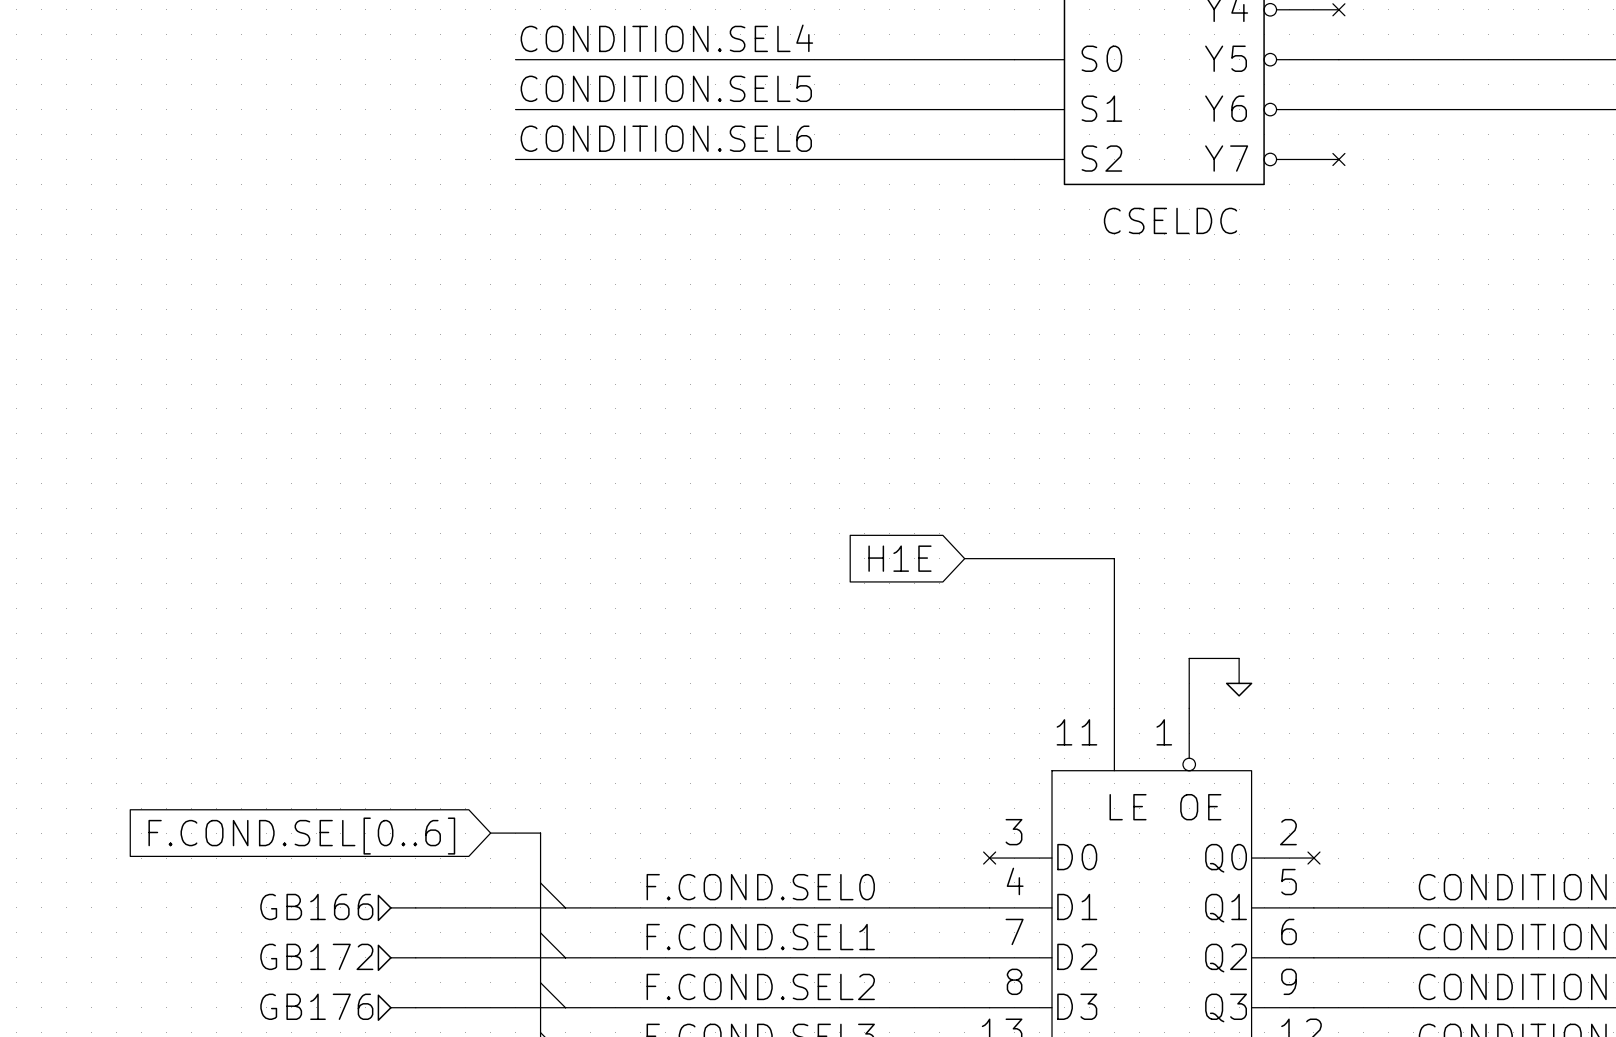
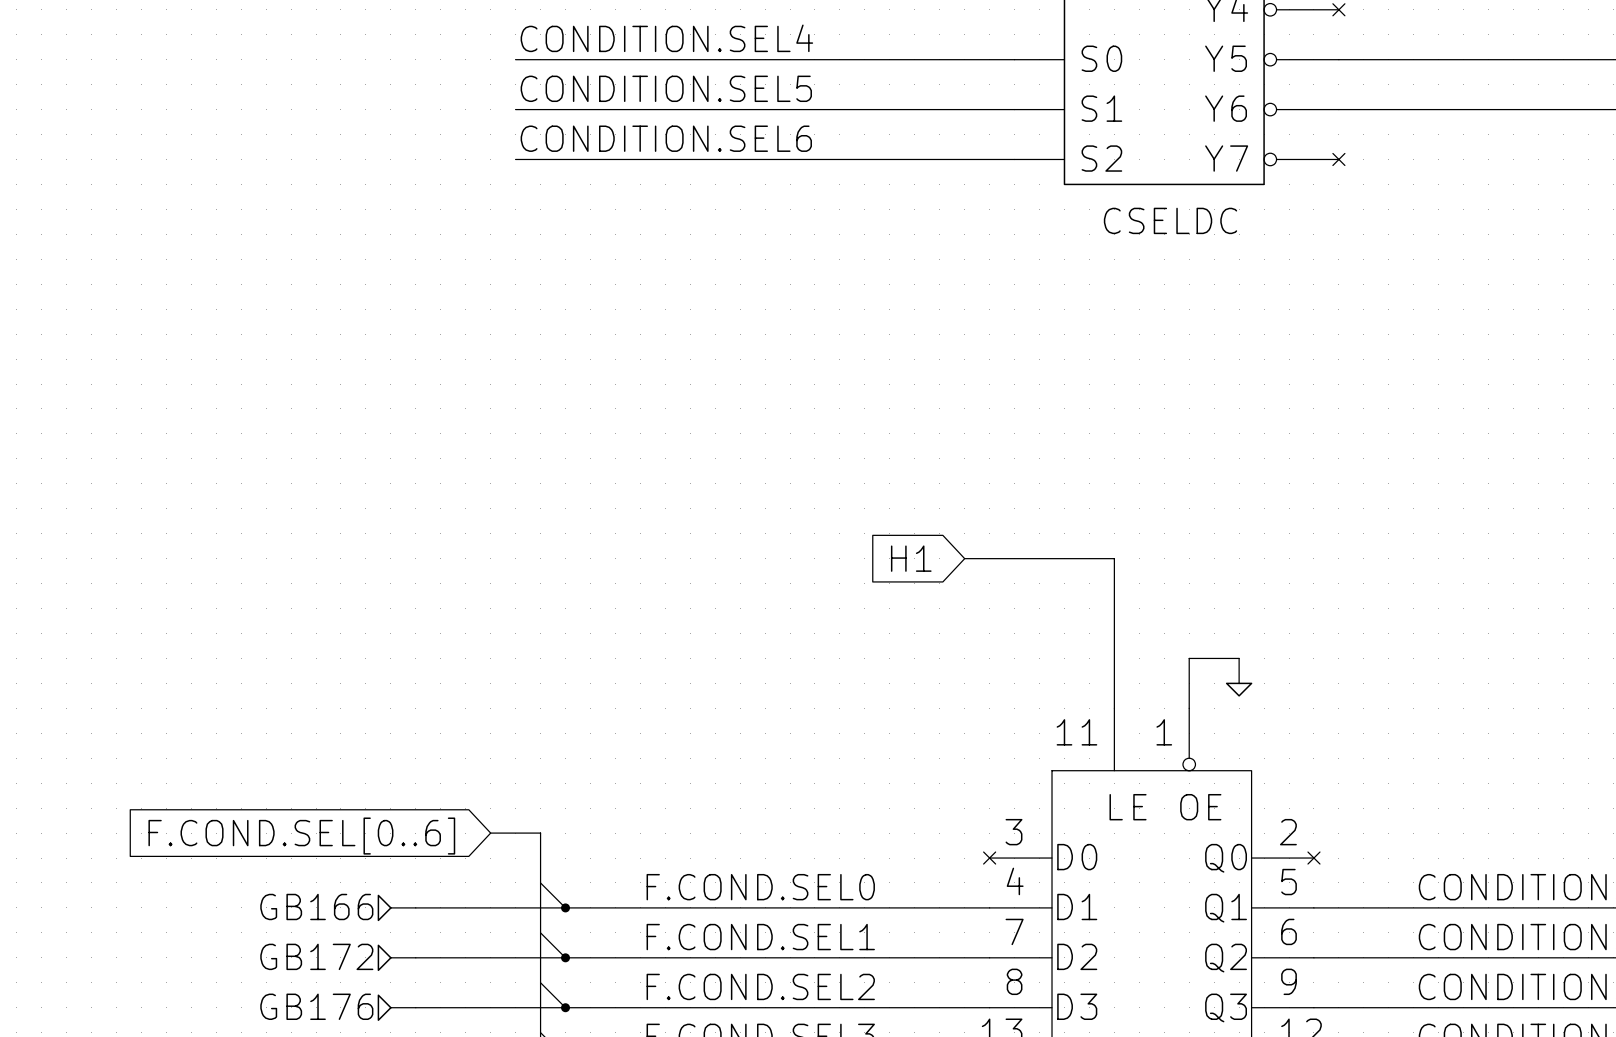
global label: H1E (899, 558) -> H1 (911, 558)
junction: none -> (565, 907)
junction: none -> (565, 957)
junction: none -> (565, 1007)

